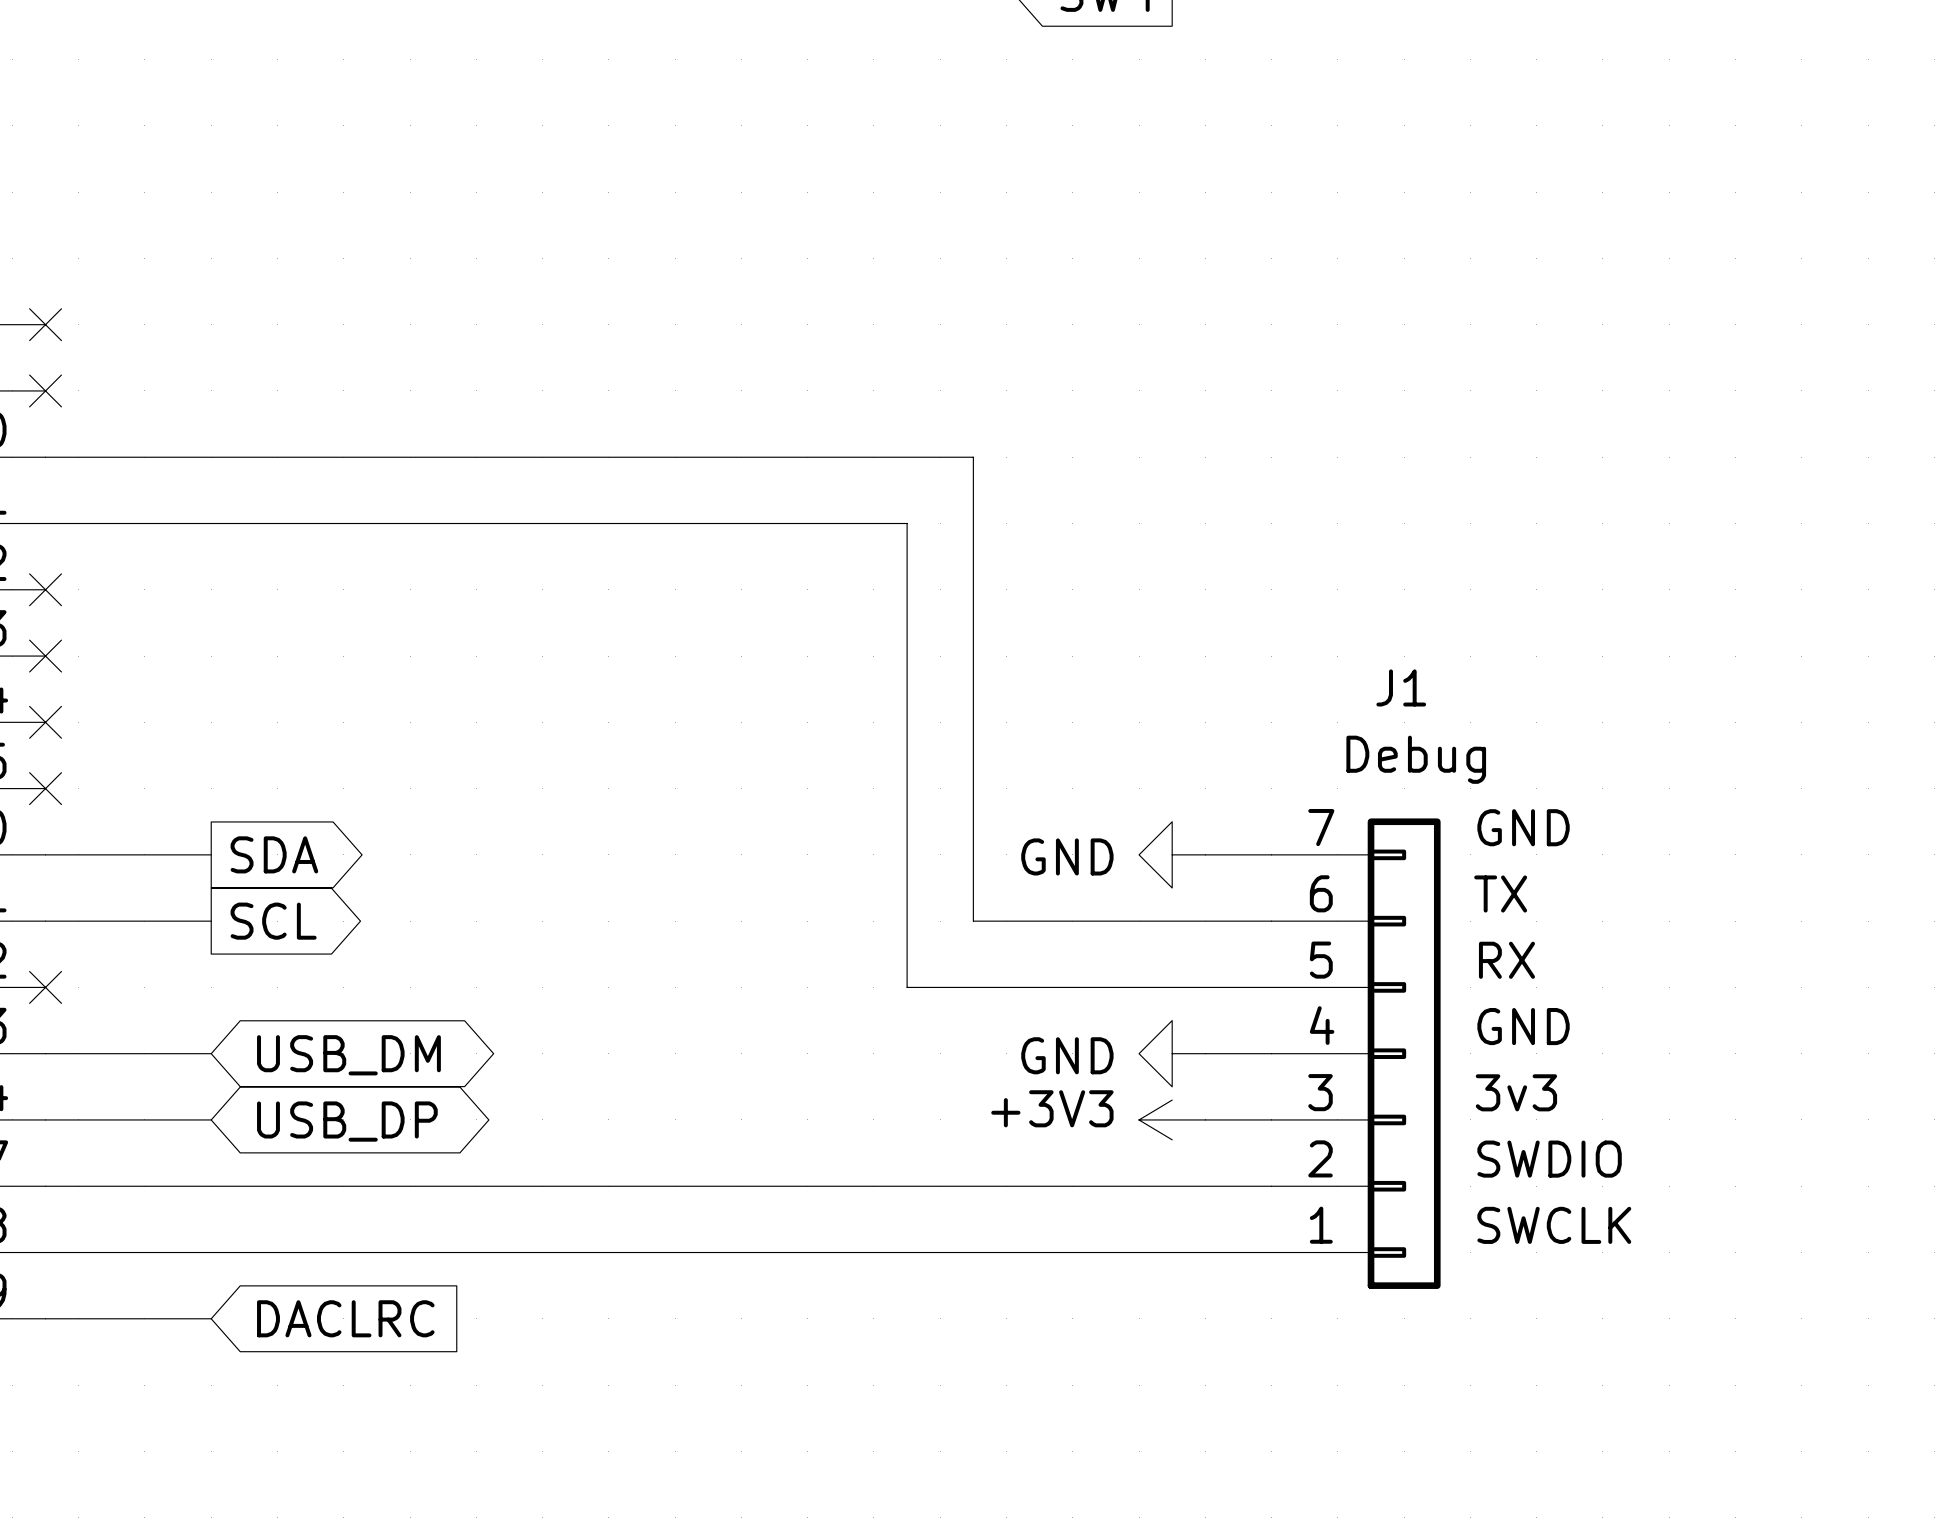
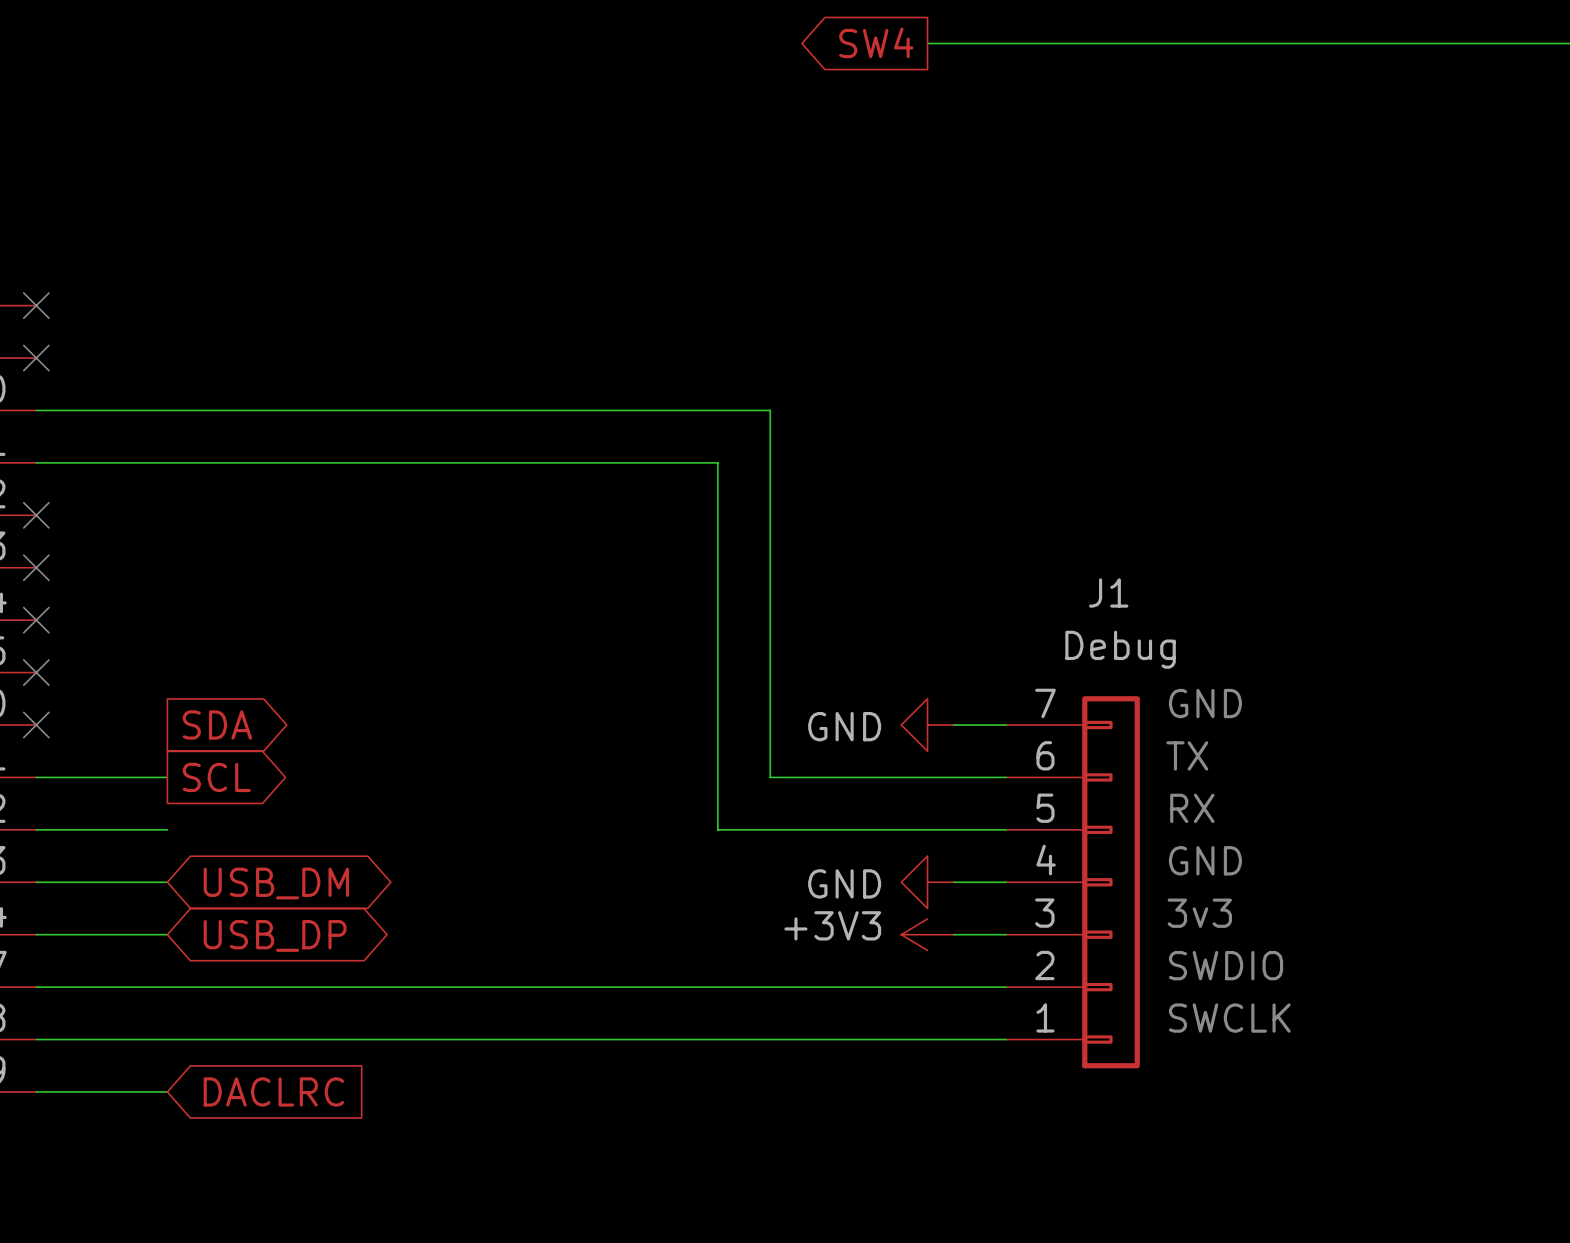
wire: (45, 854) (211, 854) -> (36, 829) (167, 829)
no-connect mark position: (45, 987) -> (36, 725)

